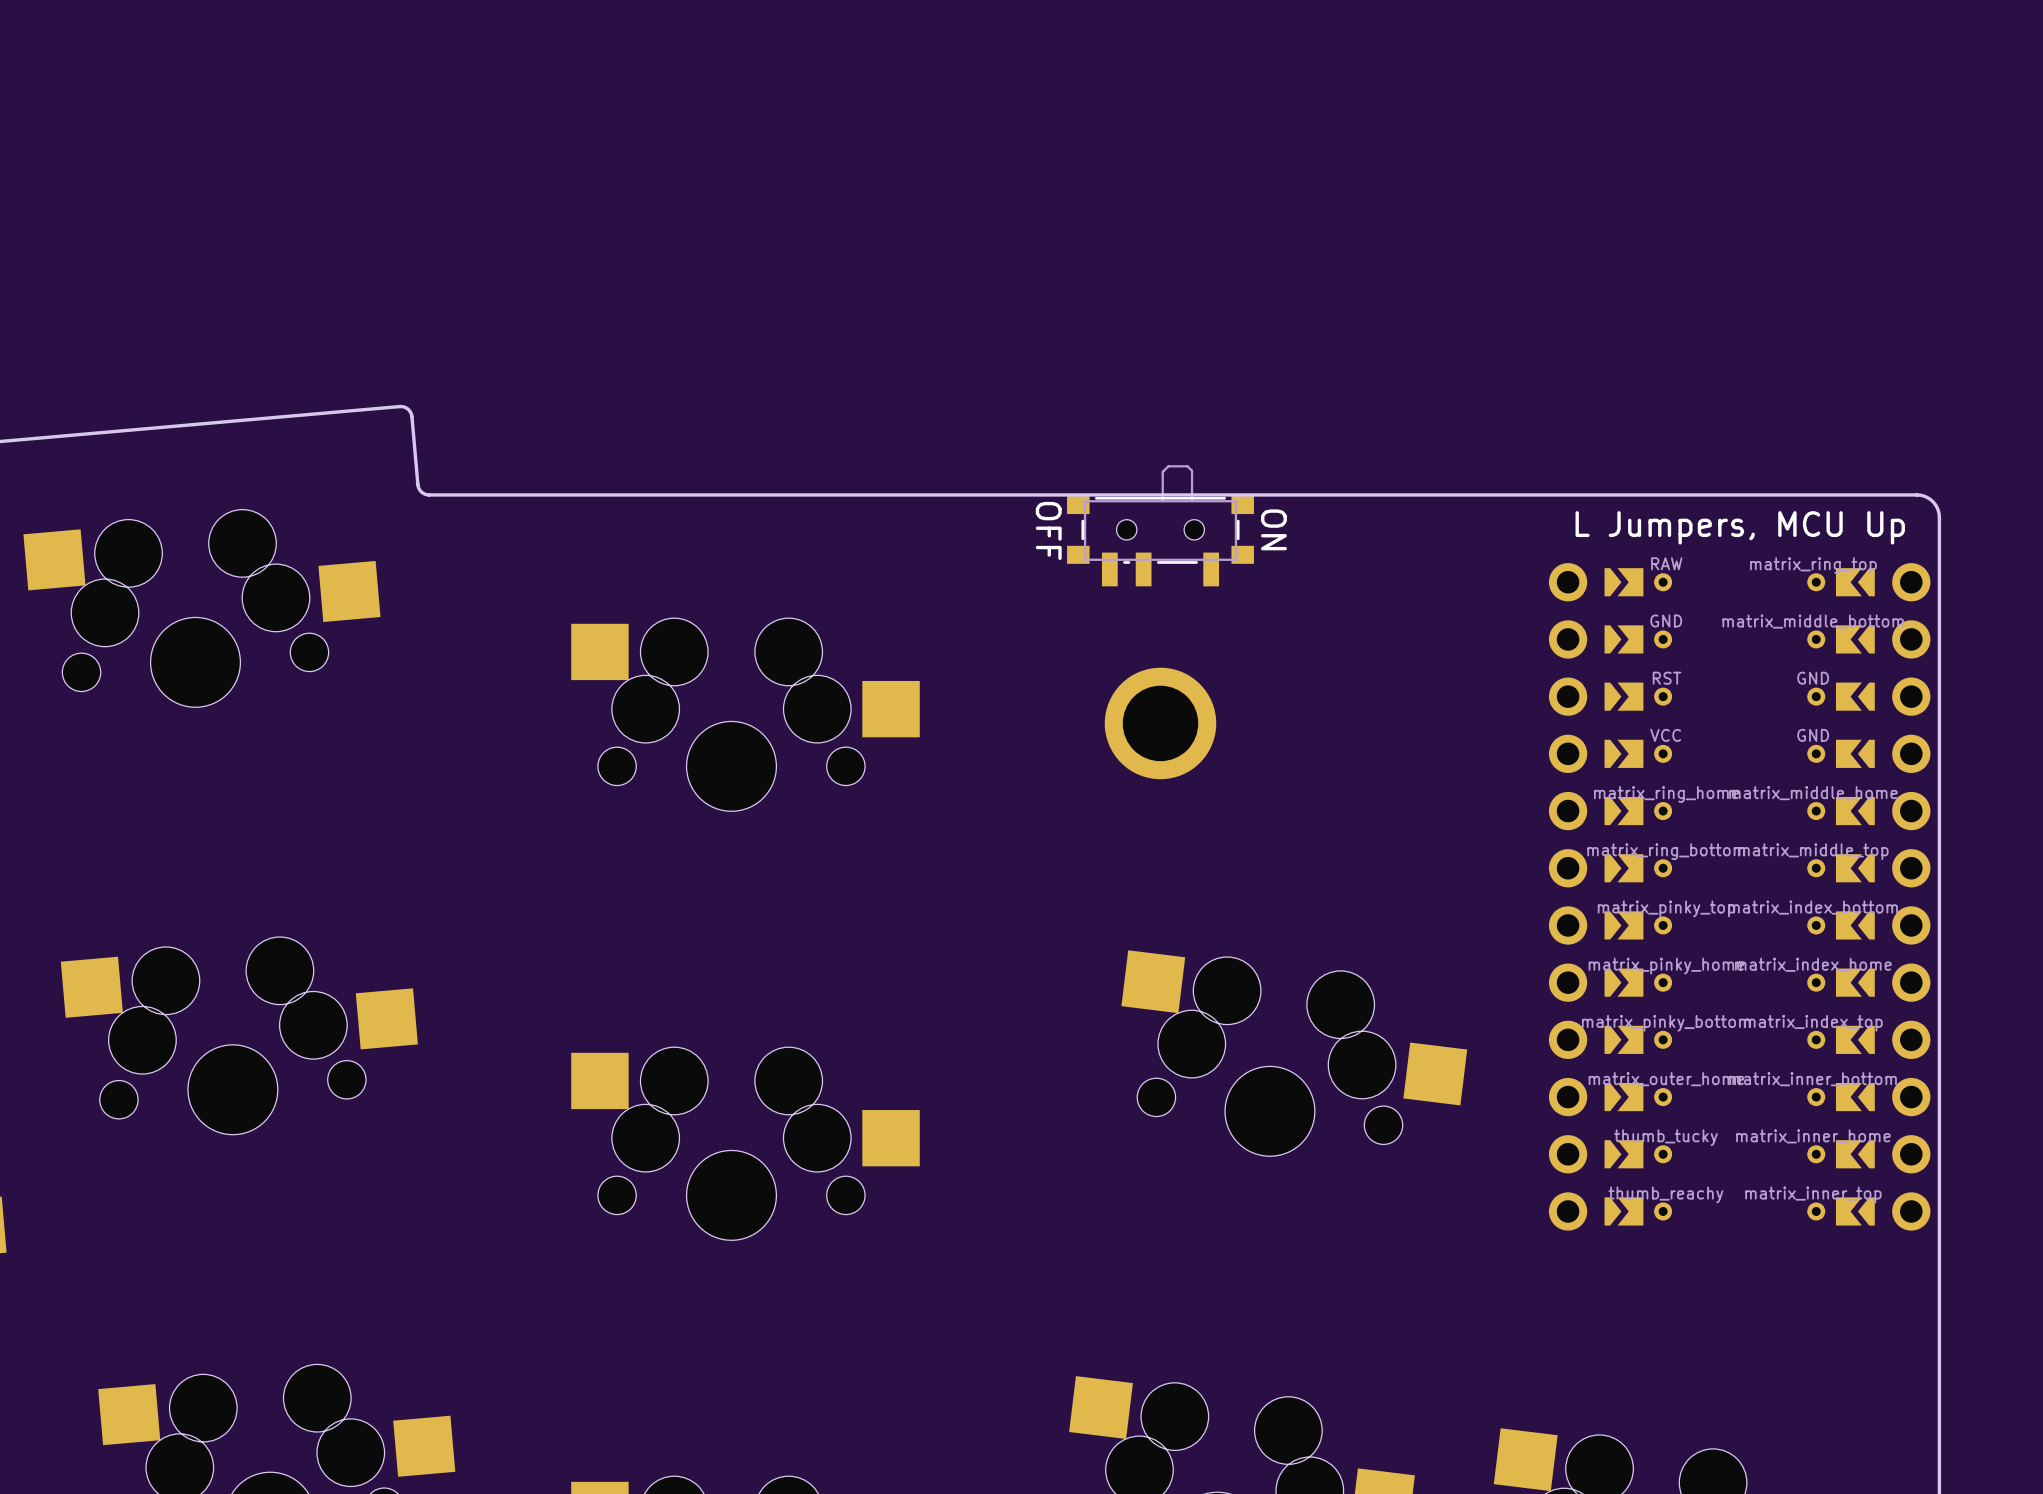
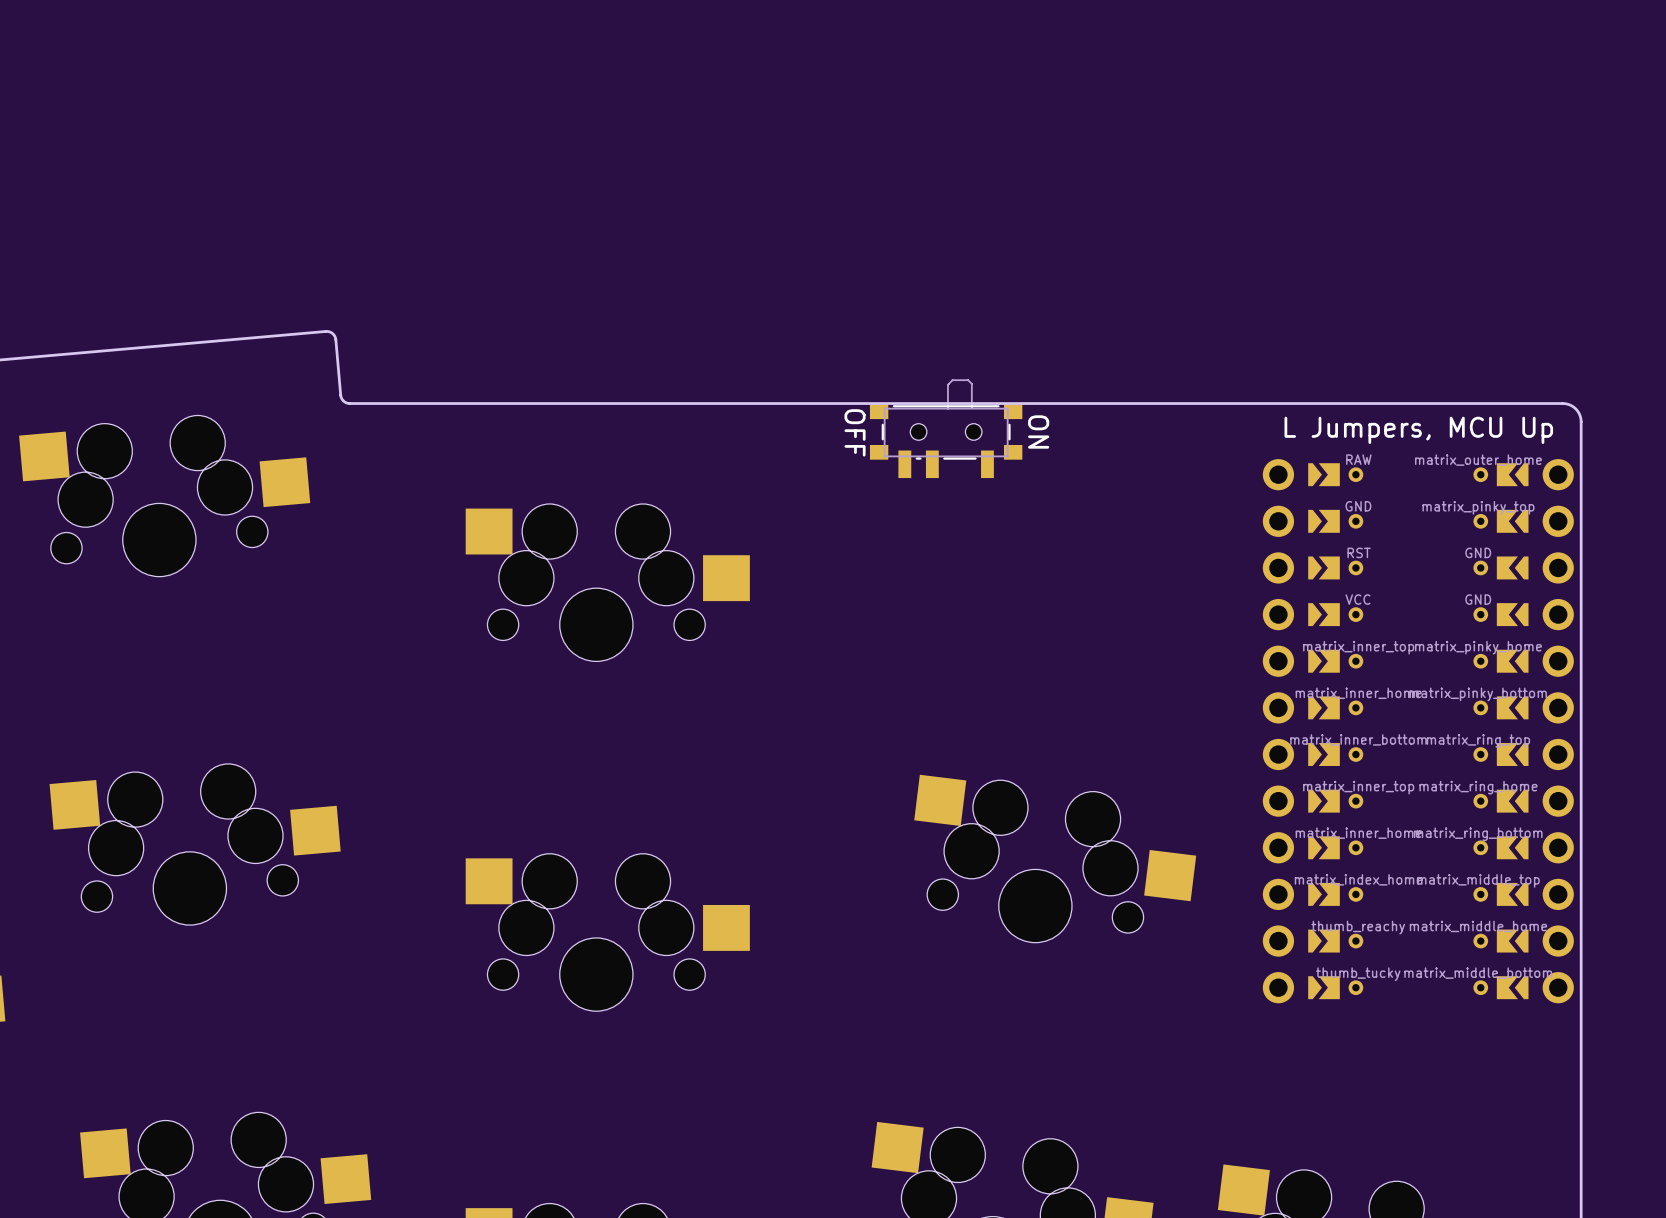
part footprint: [1548, 563, 1931, 1231] -> [1262, 459, 1574, 1004]
part: (1160, 723) -> none

